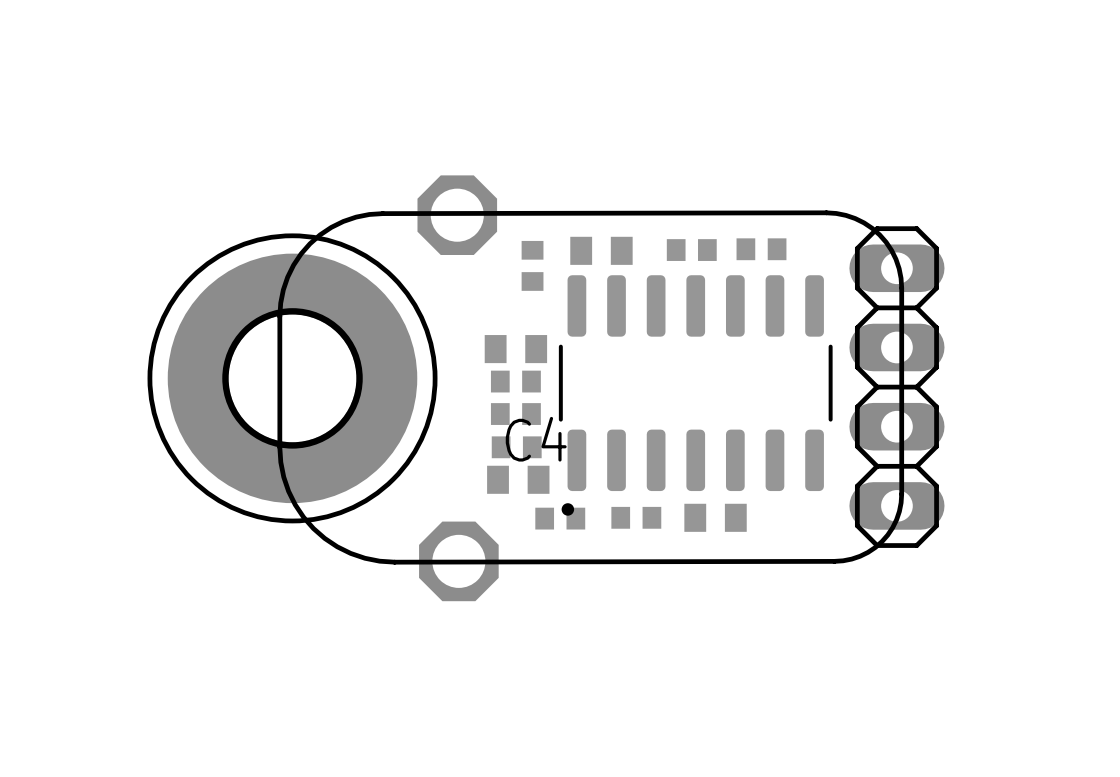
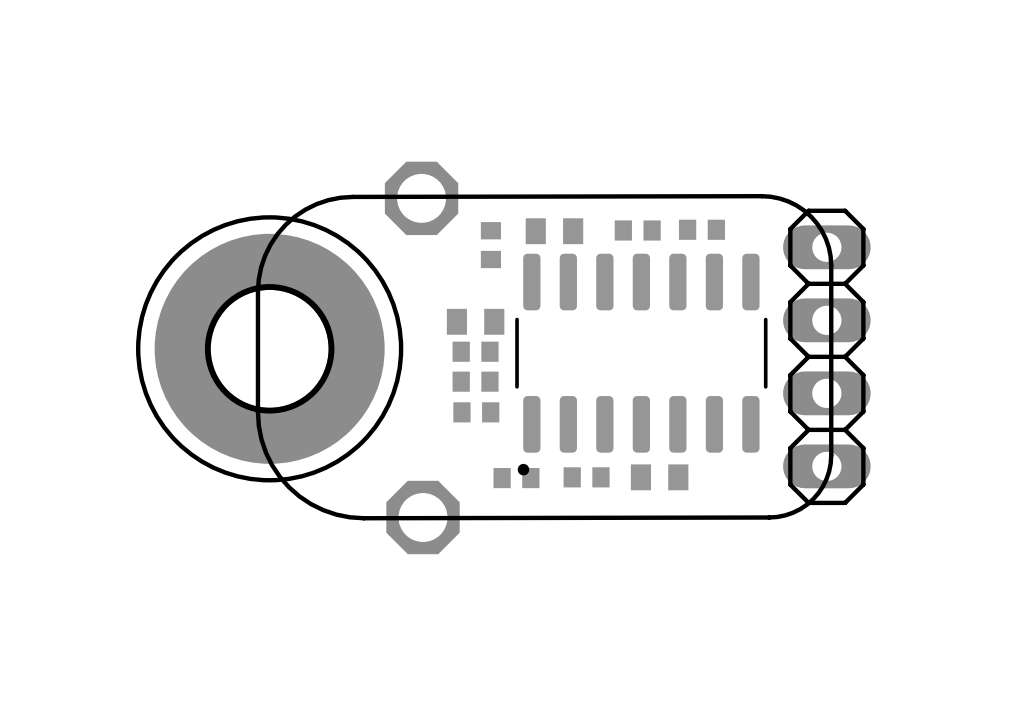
C4: (518, 479) -> none

